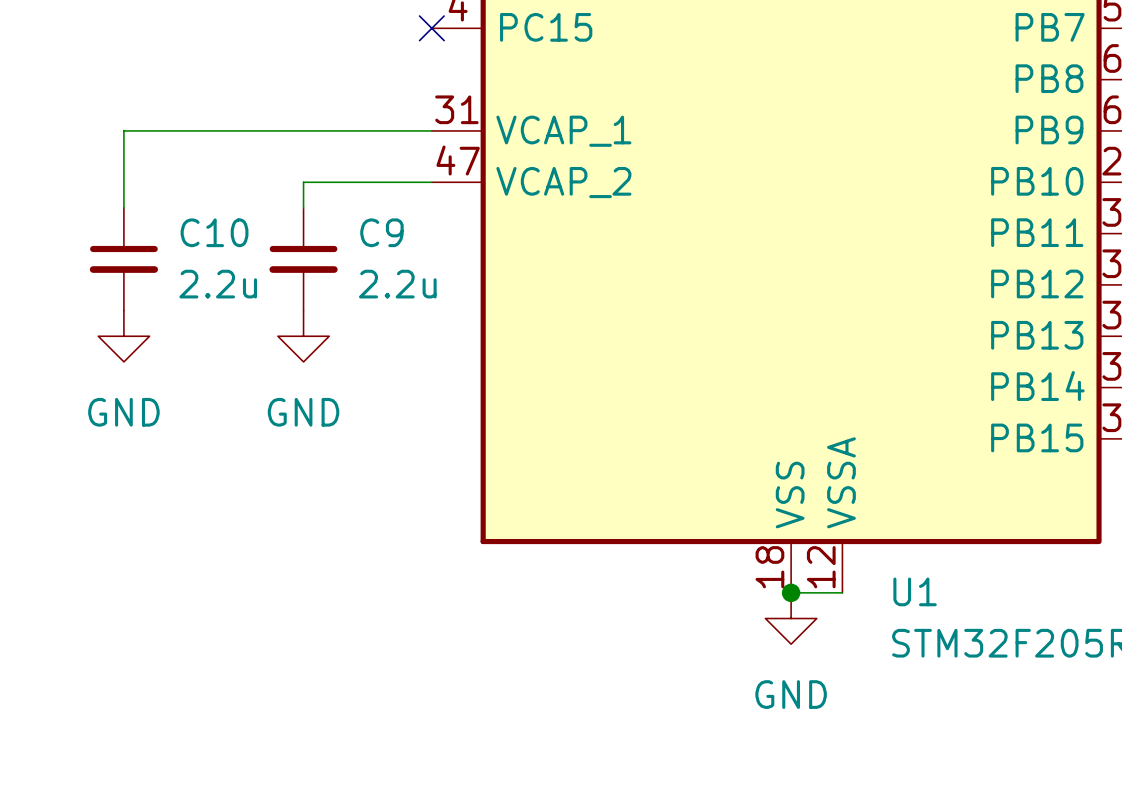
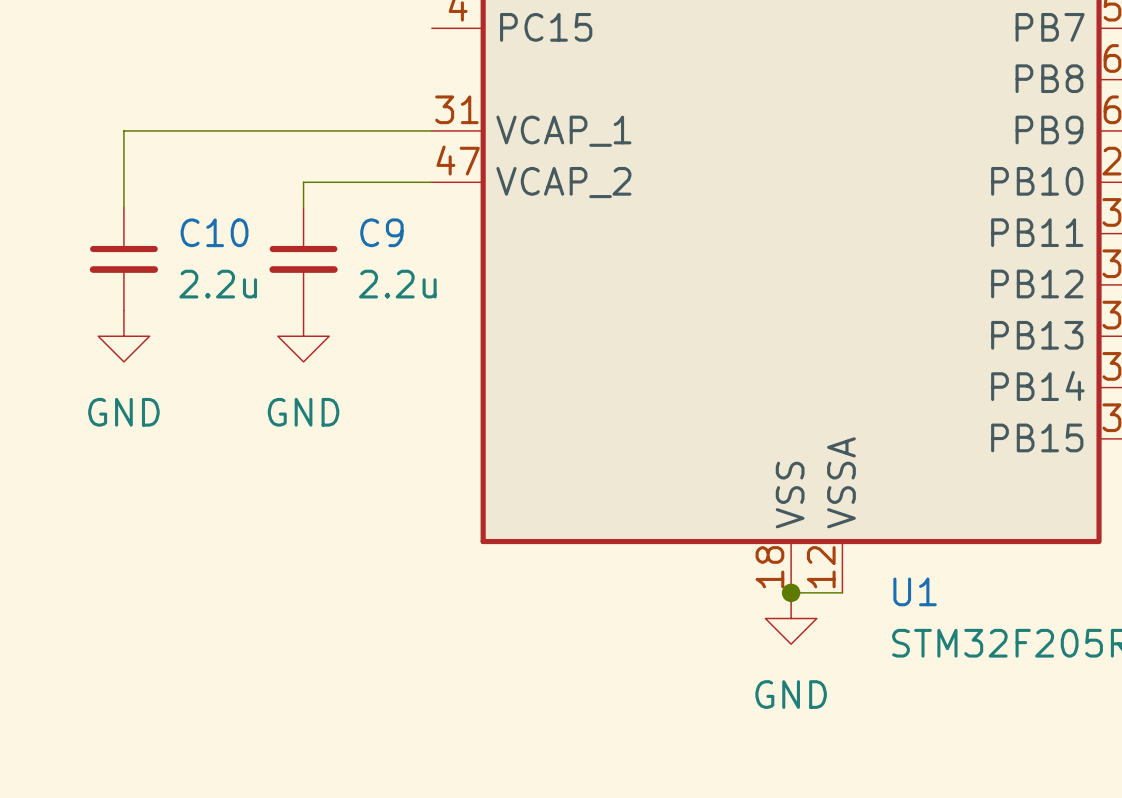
no-connect mark: (431, 28) -> none

